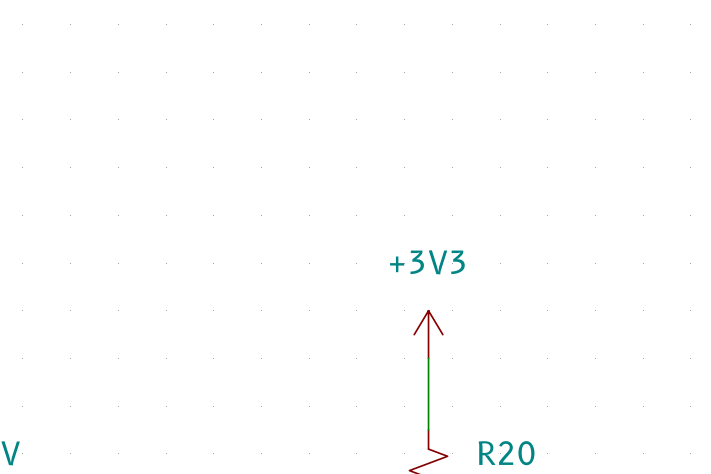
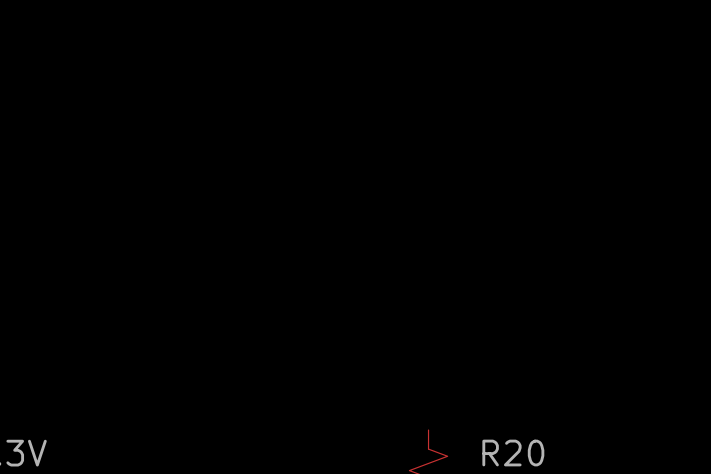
power symbol: +3V3 (428, 334) -> none
wire: (428, 358) (428, 430) -> none

